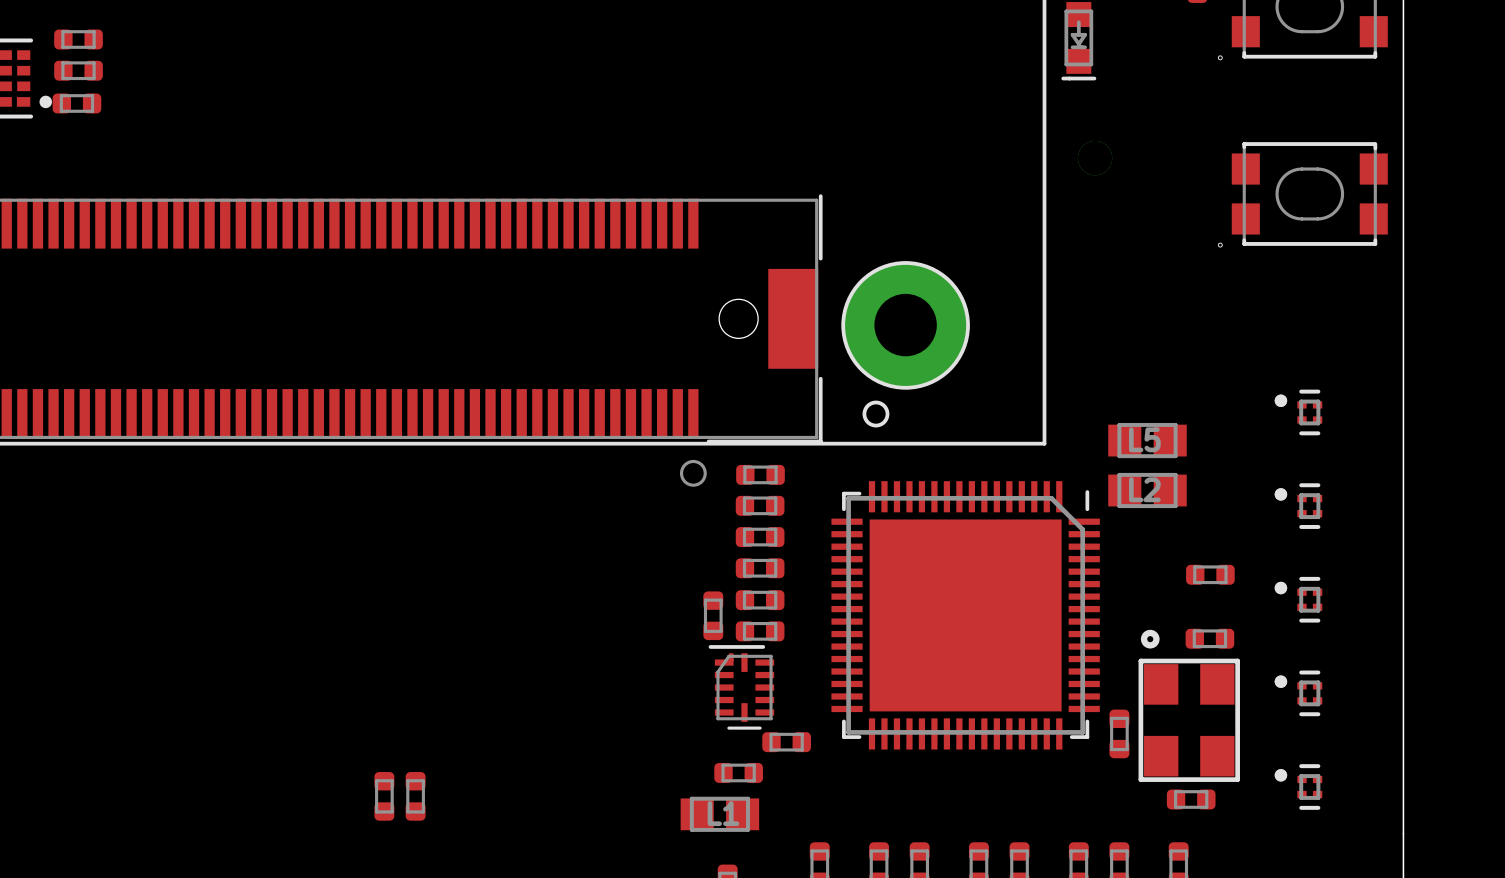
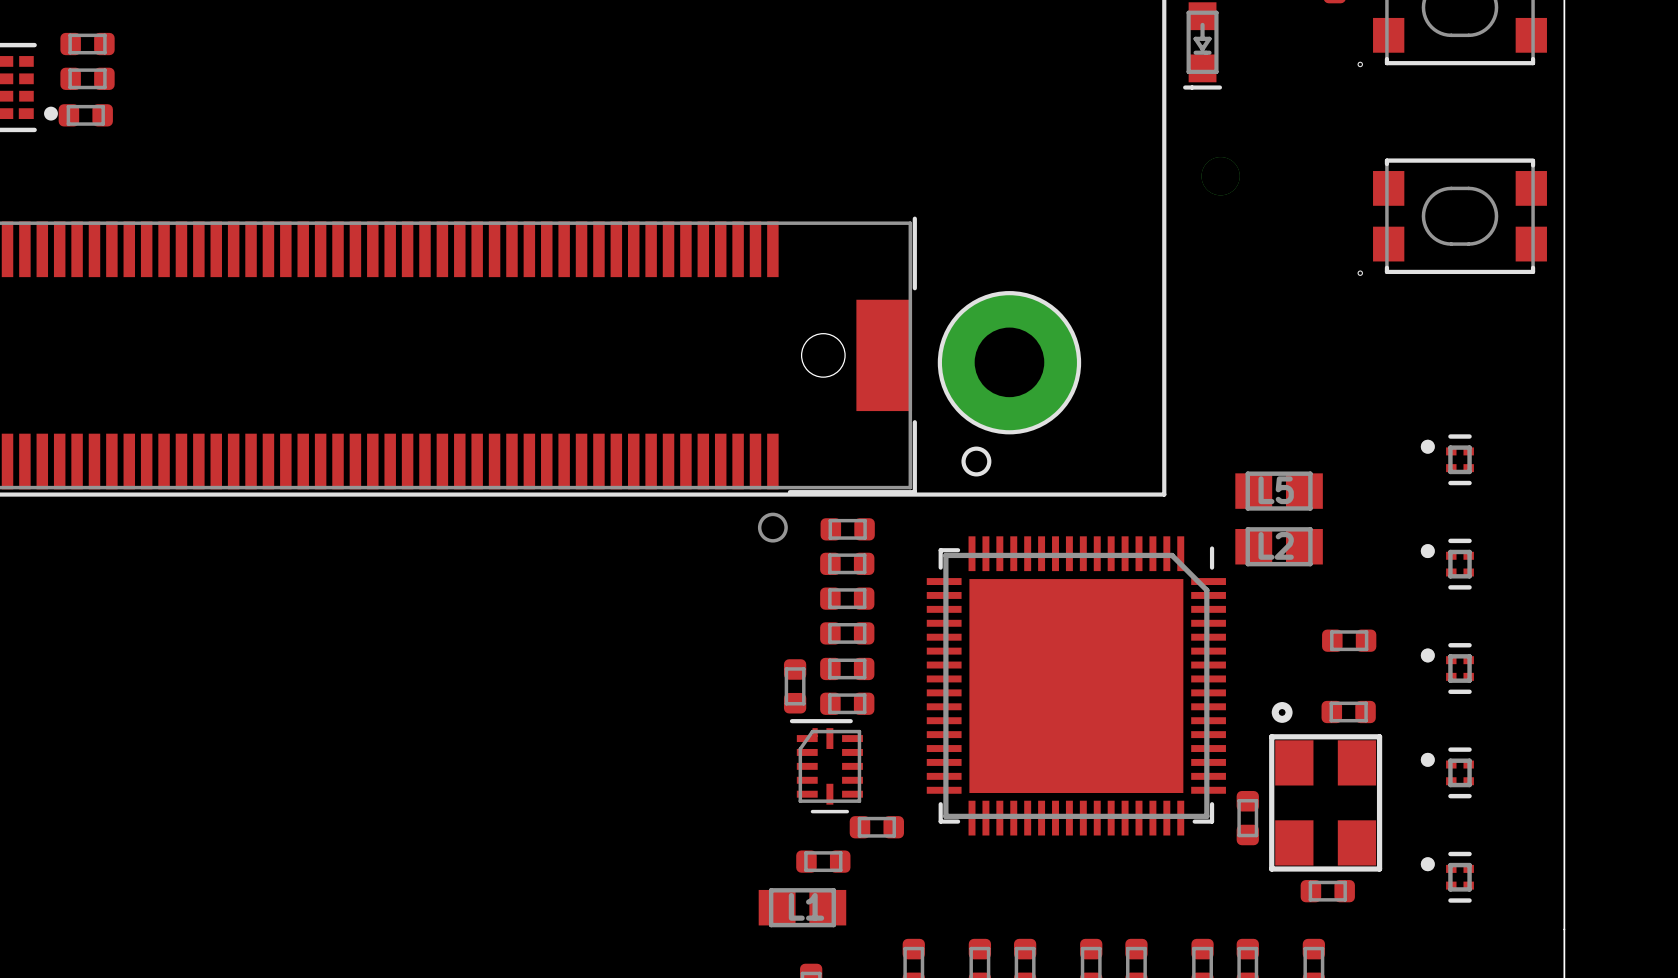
part: (384, 796) -> none
part: (415, 796) -> none

